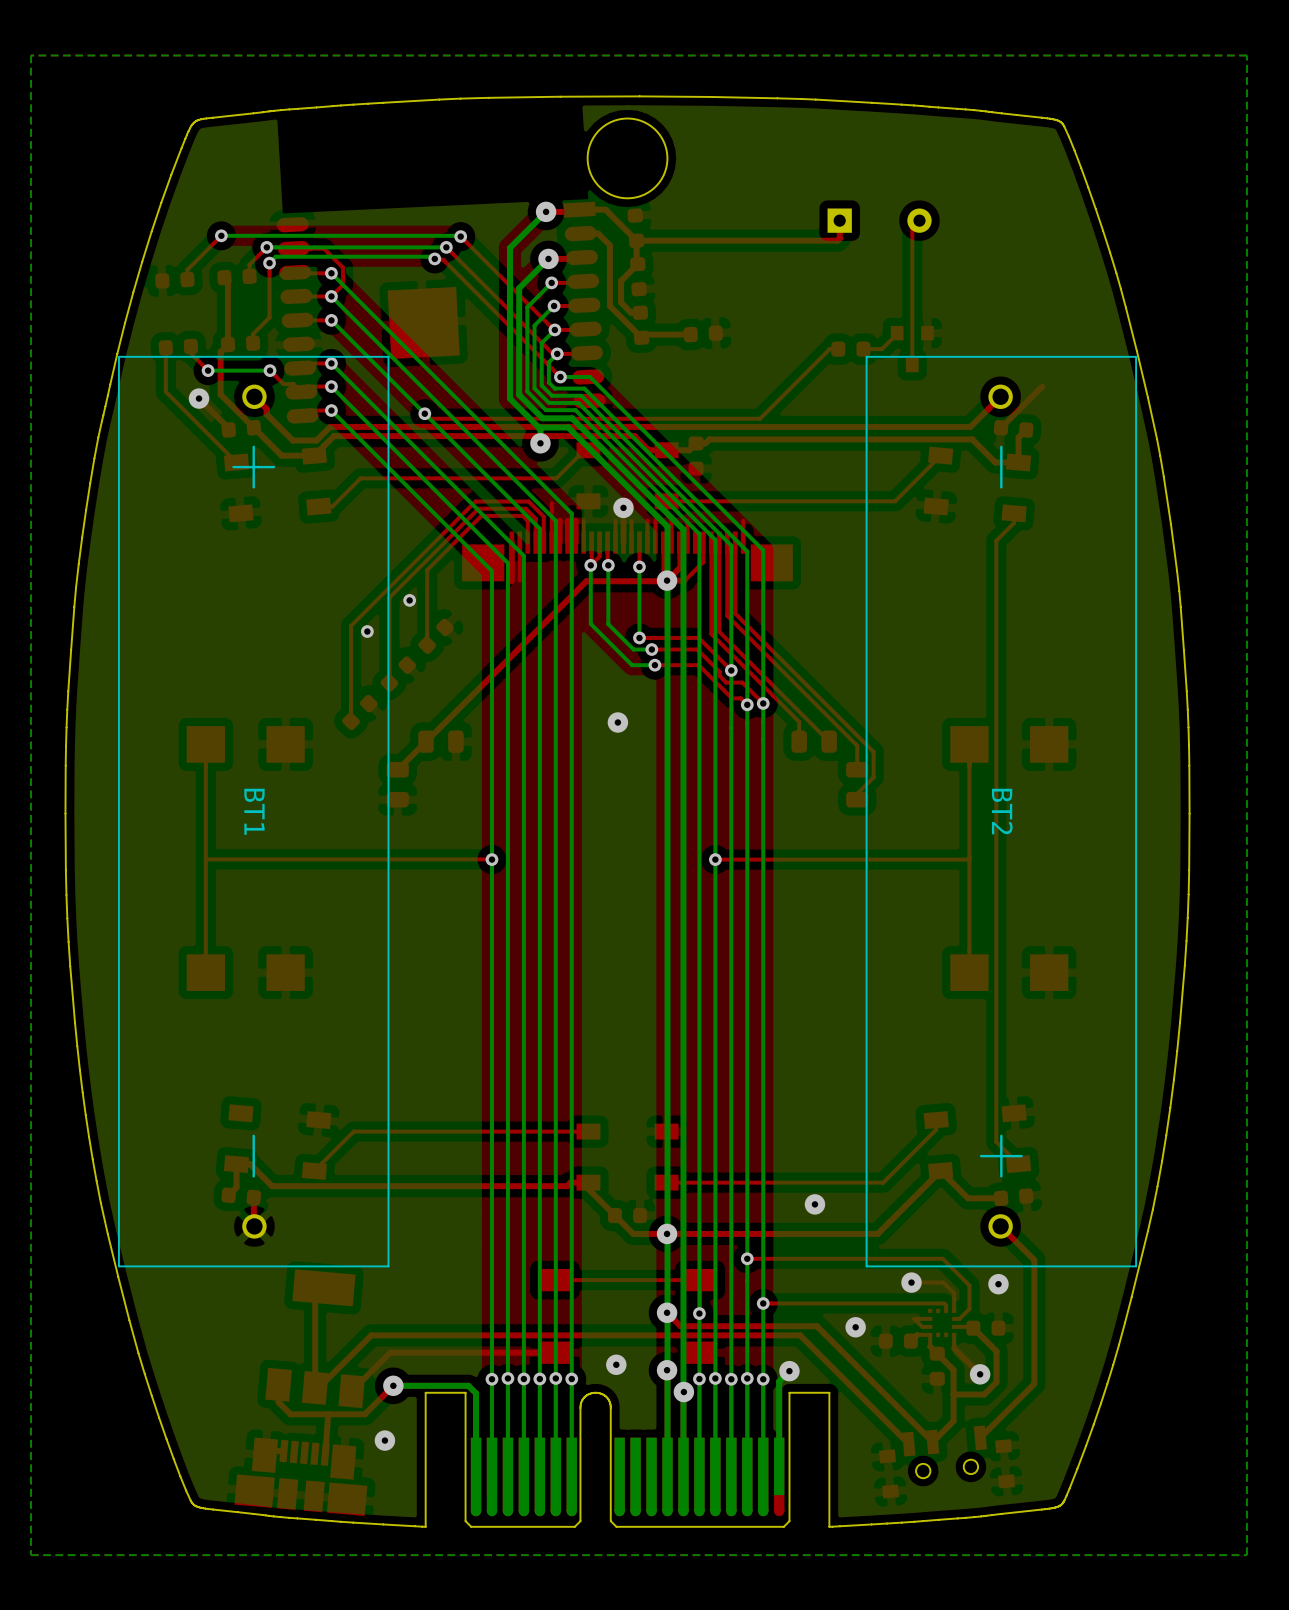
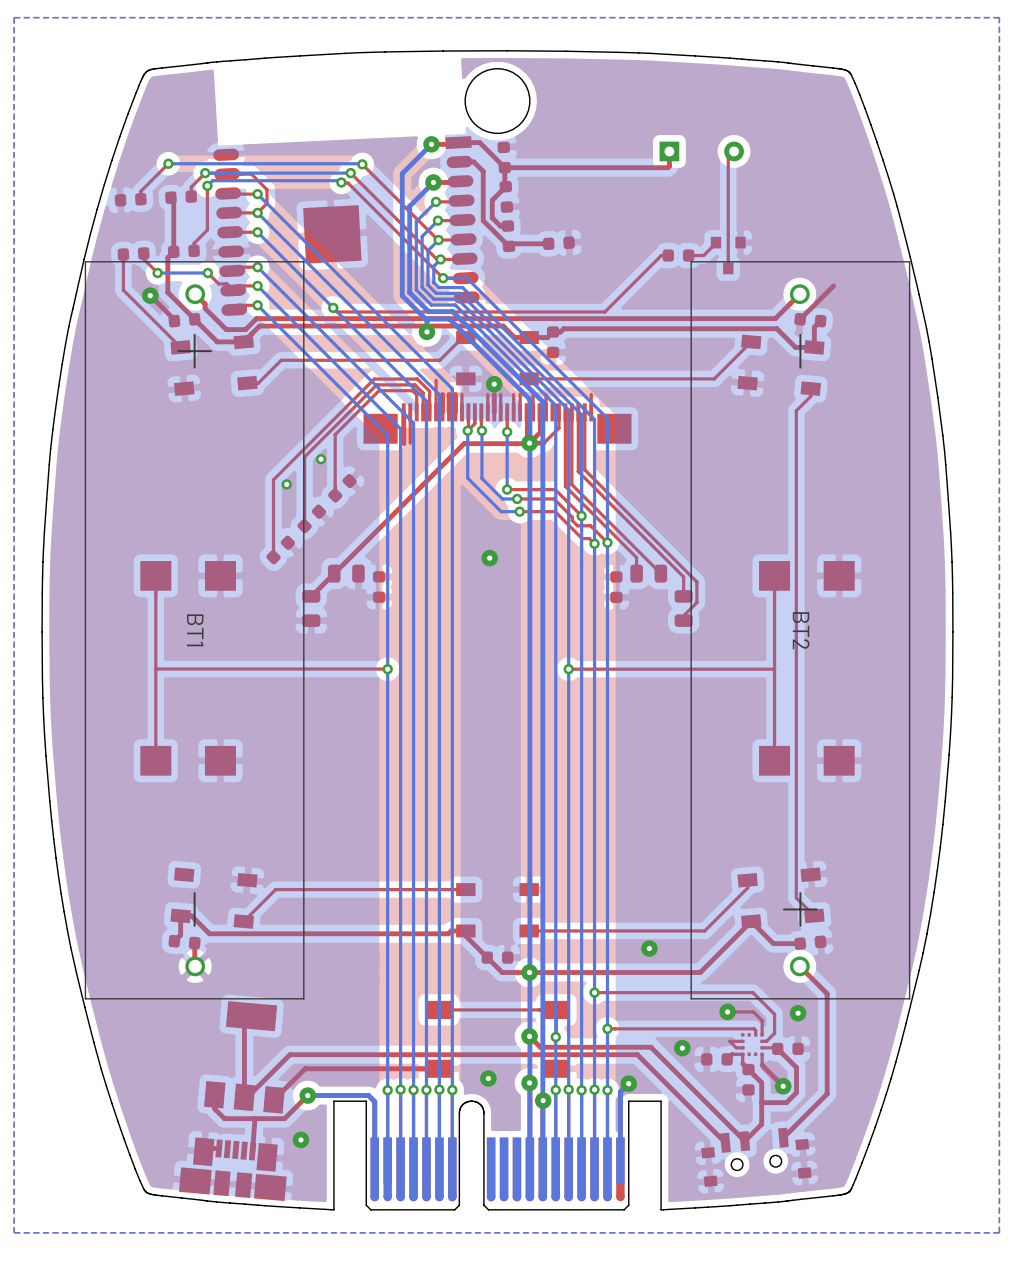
part: none -> (379, 587)
part: none -> (616, 587)

